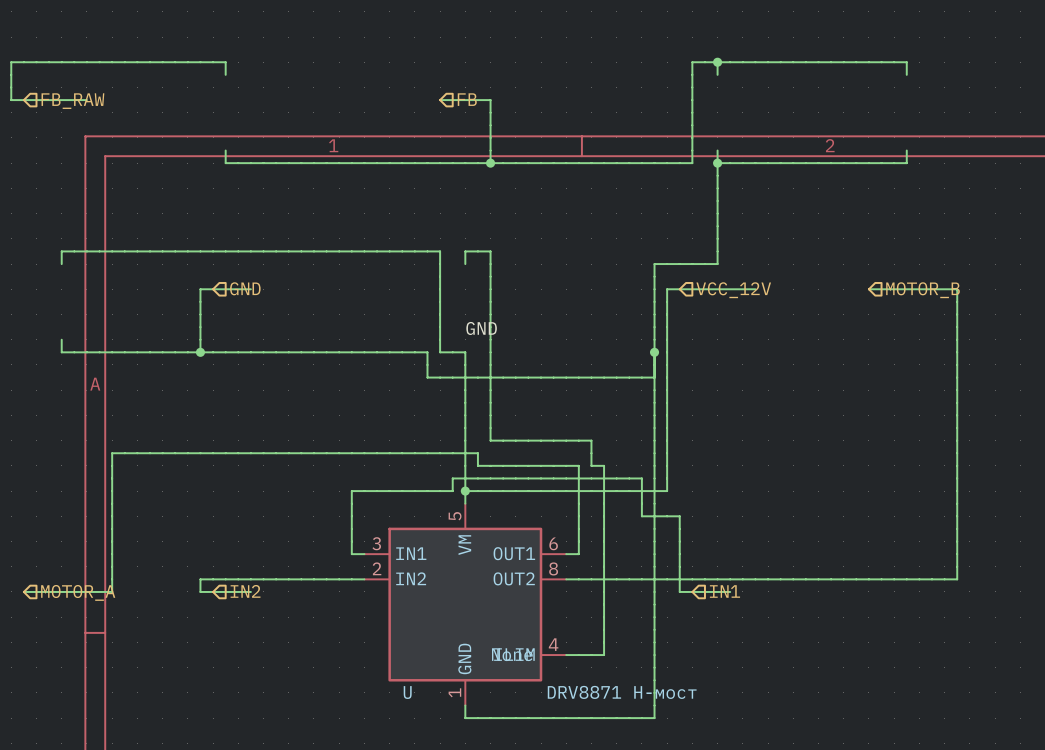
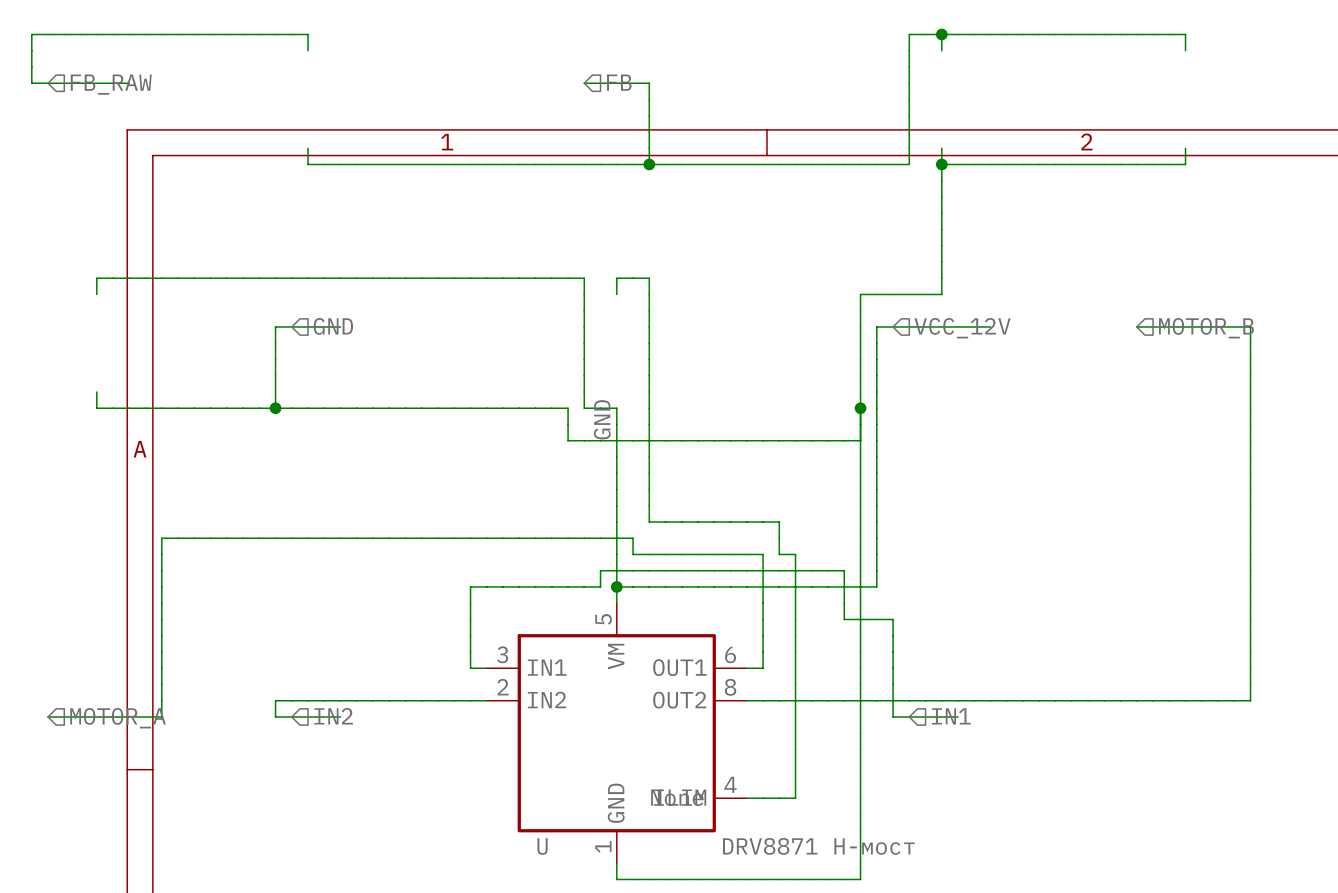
label rotation: 0° (481, 328) -> 90° counterclockwise (602, 419)

